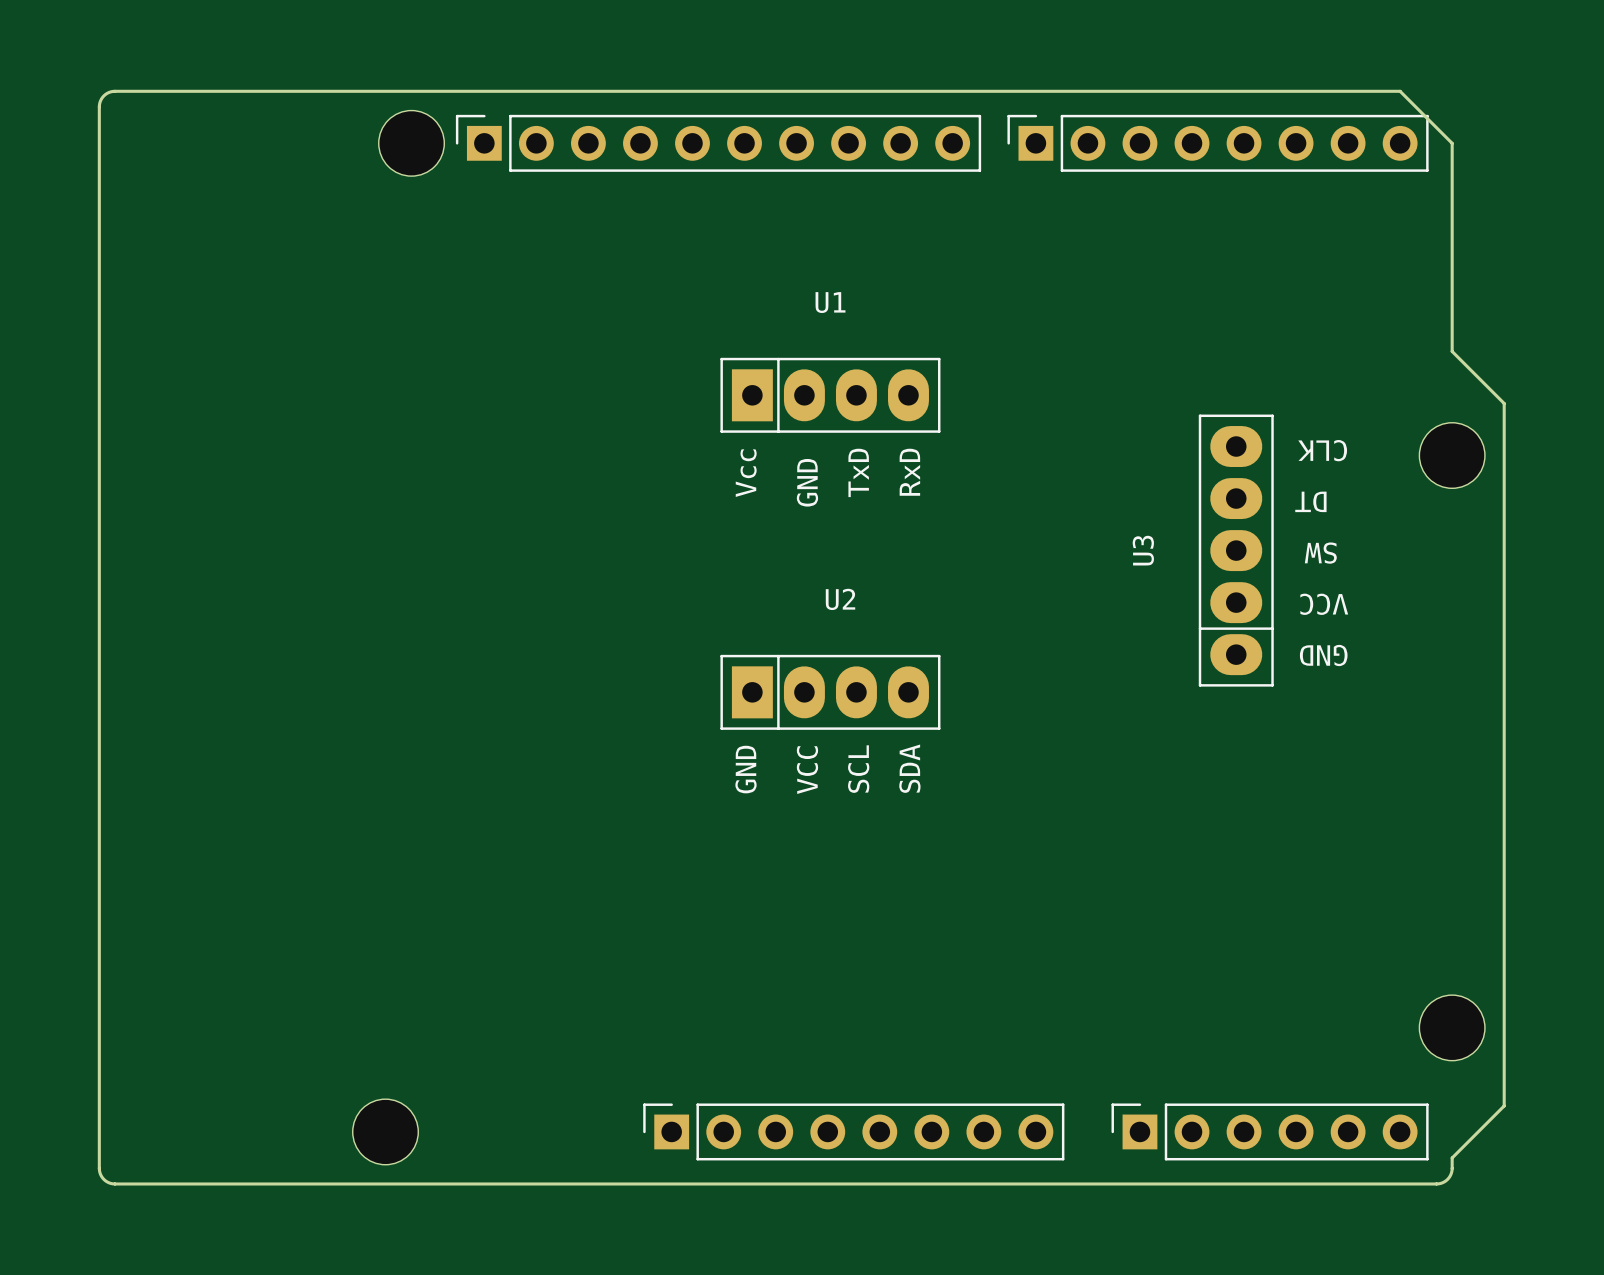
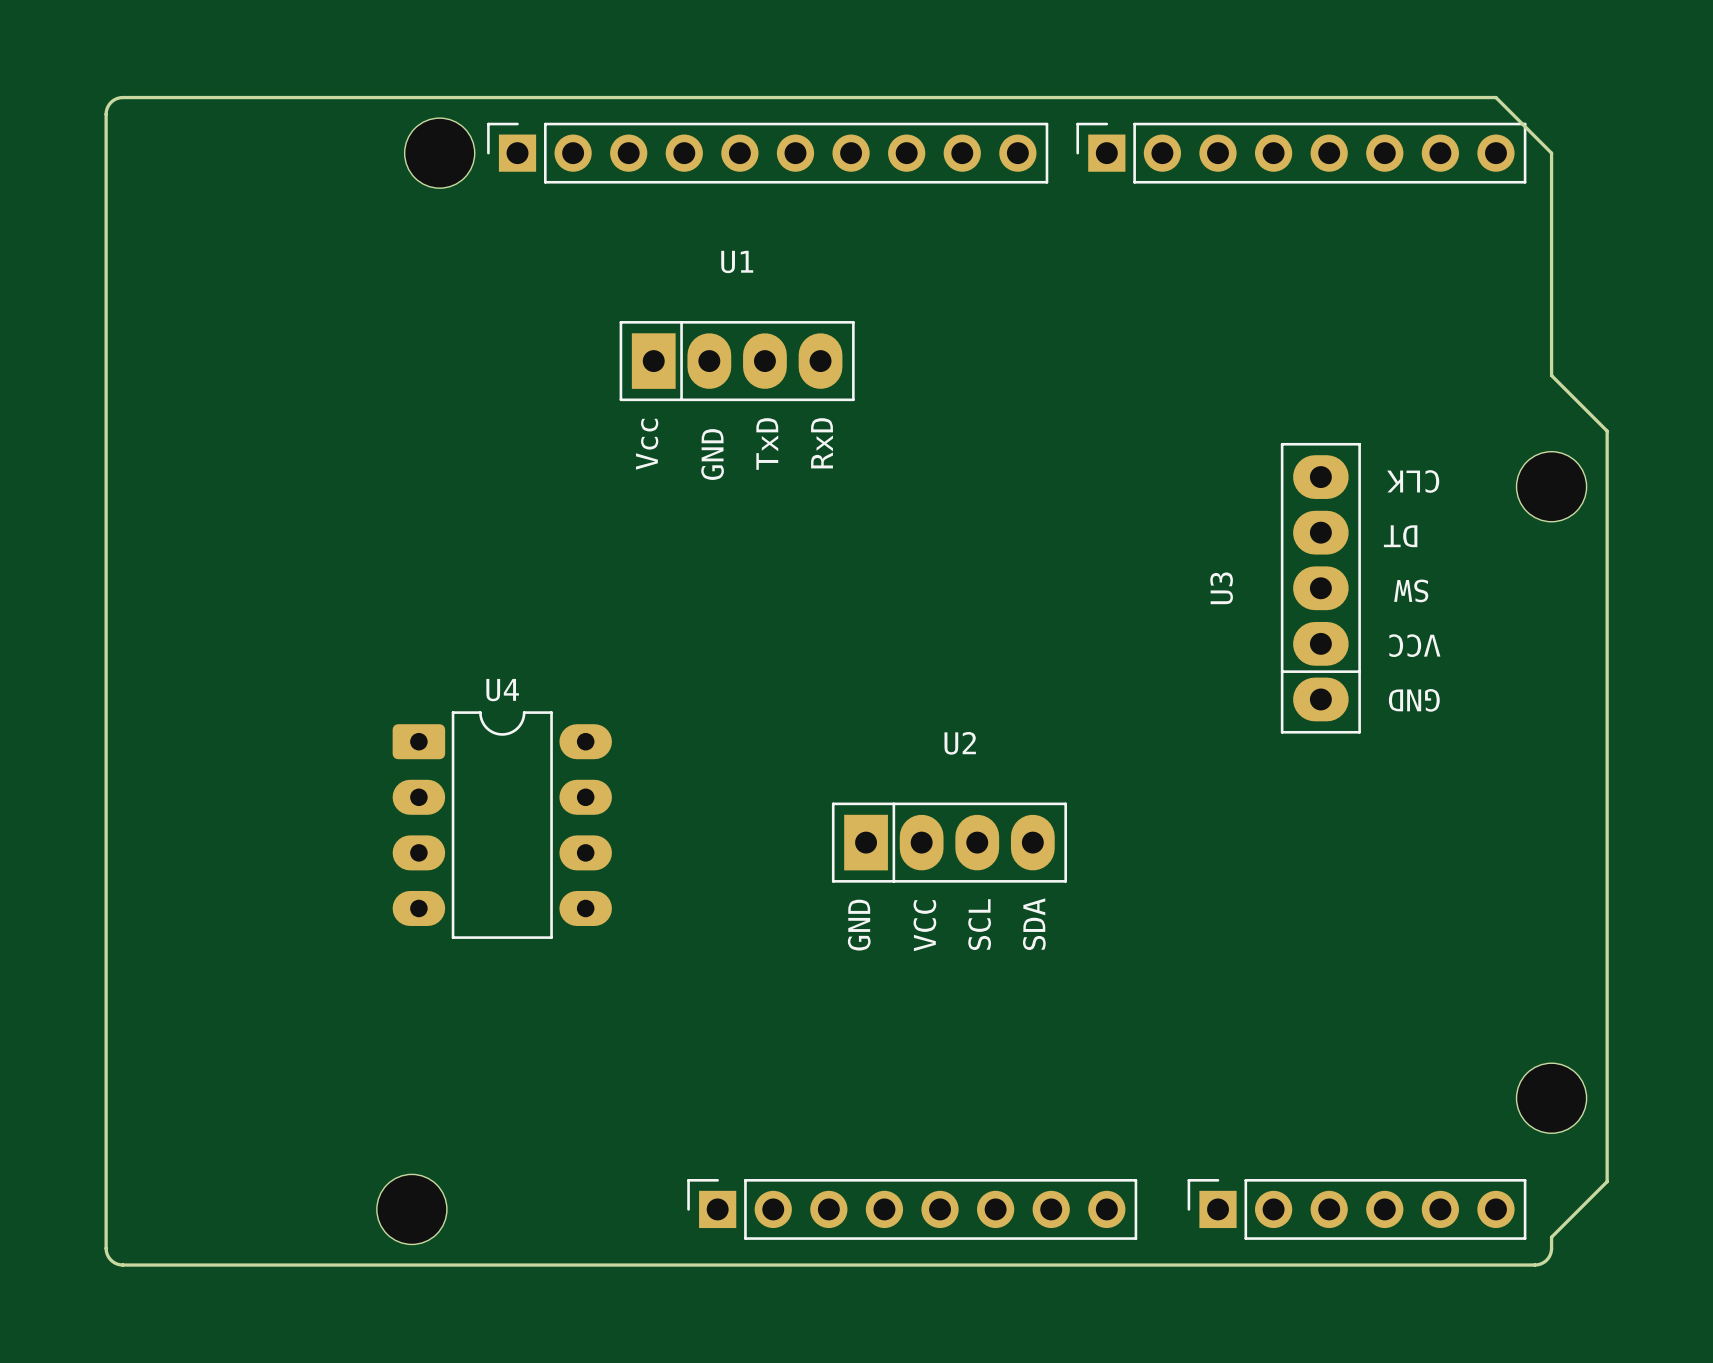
U1 position: (830, 395) -> (737, 361)
U2 position: (830, 692) -> (949, 842)
U4: none -> (502, 825)

